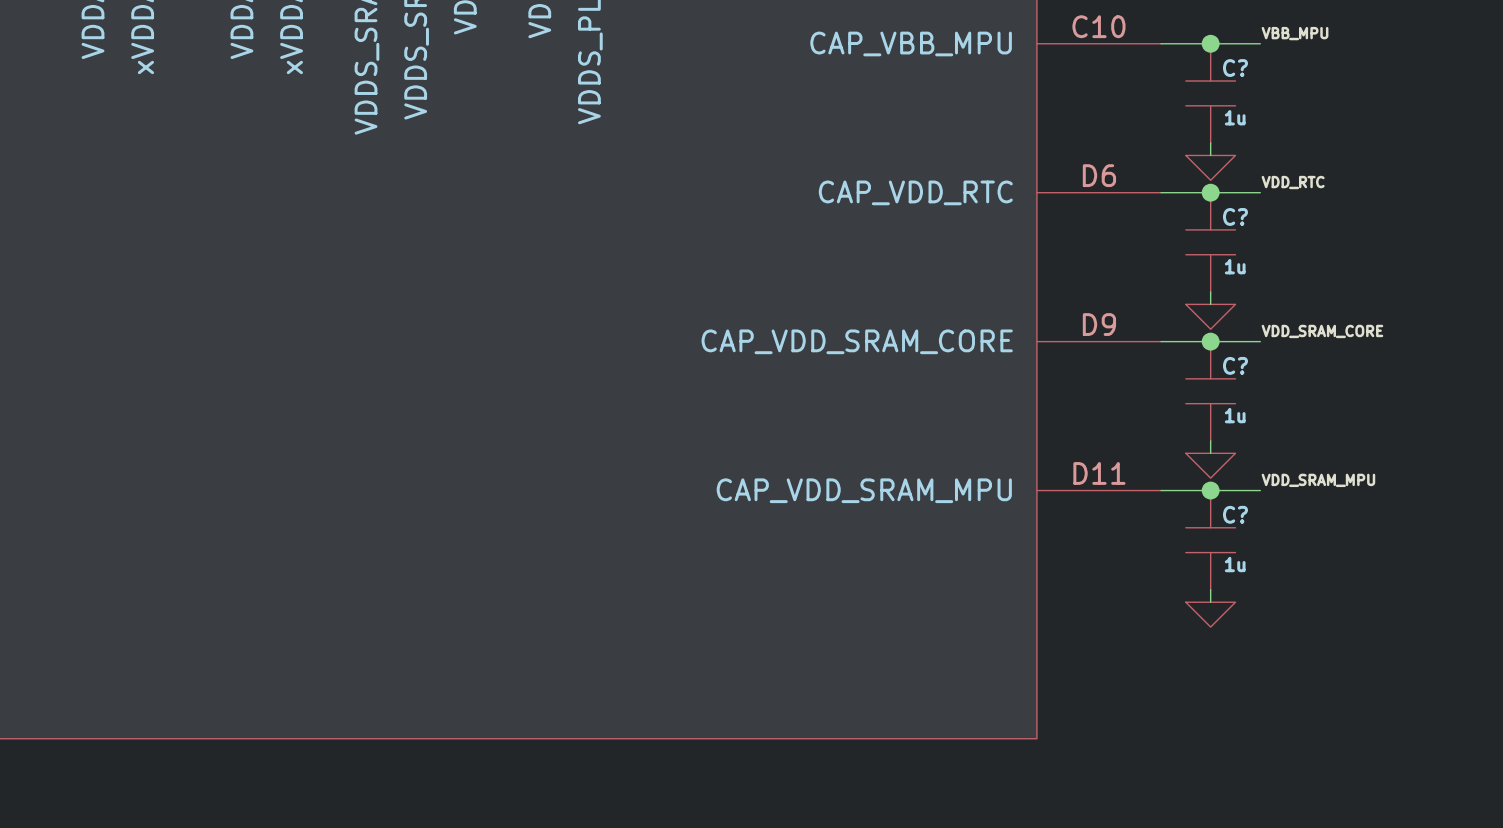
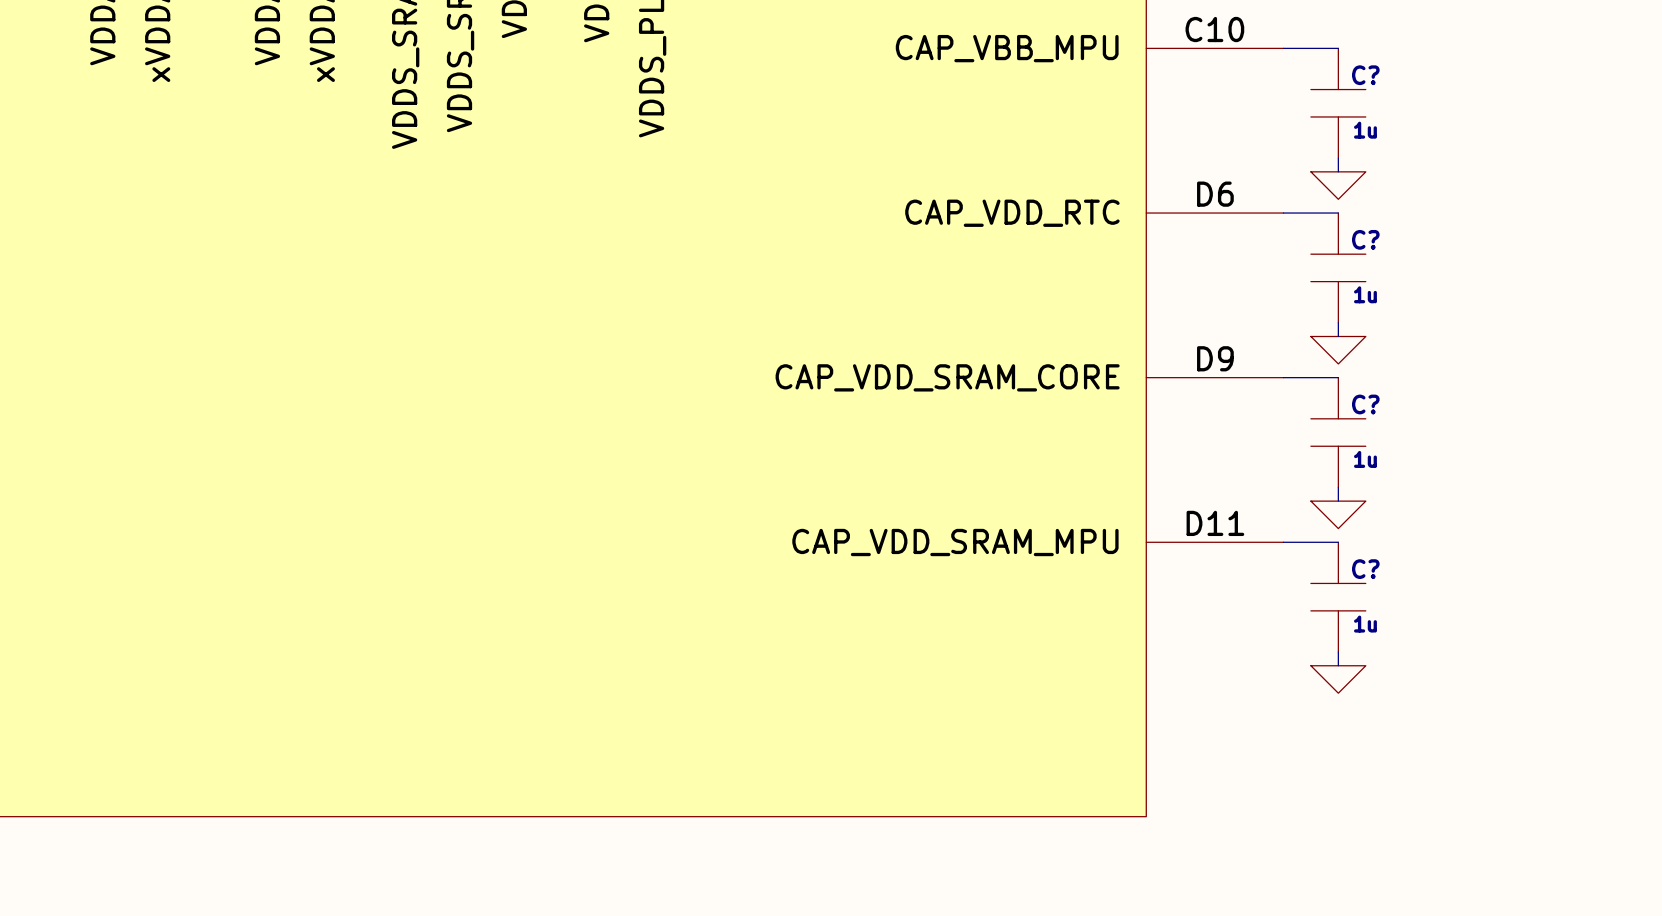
label: VBB_MPU (1295, 33) -> none
wire: (1210, 43) (1260, 43) -> none
junction: (1210, 43) -> none
label: VDD_RTC (1293, 182) -> none
wire: (1210, 192) (1260, 192) -> none
junction: (1210, 192) -> none
label: VDD_SRAM_CORE (1322, 331) -> none
wire: (1210, 341) (1260, 341) -> none
junction: (1210, 341) -> none
label: VDD_SRAM_MPU (1318, 480) -> none
wire: (1210, 490) (1260, 490) -> none
junction: (1210, 490) -> none

